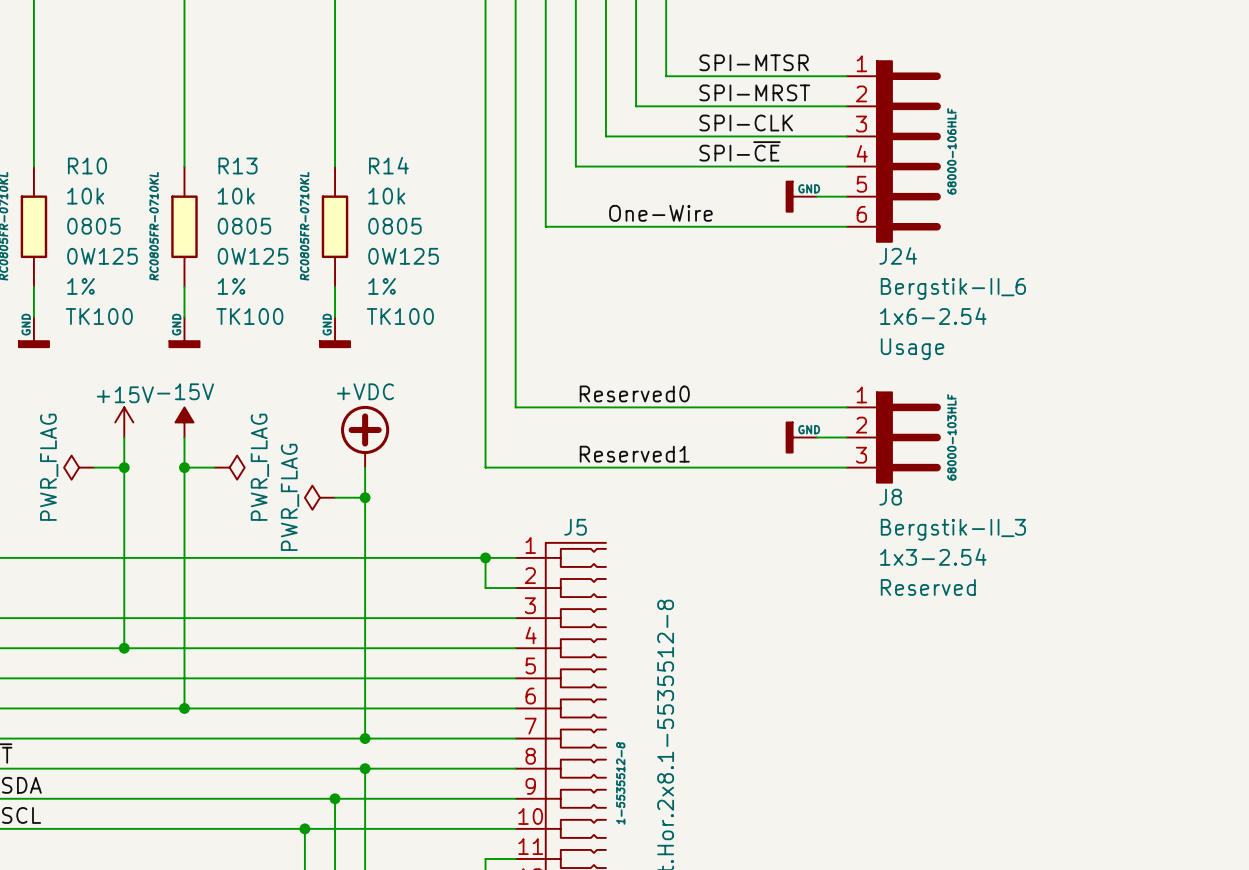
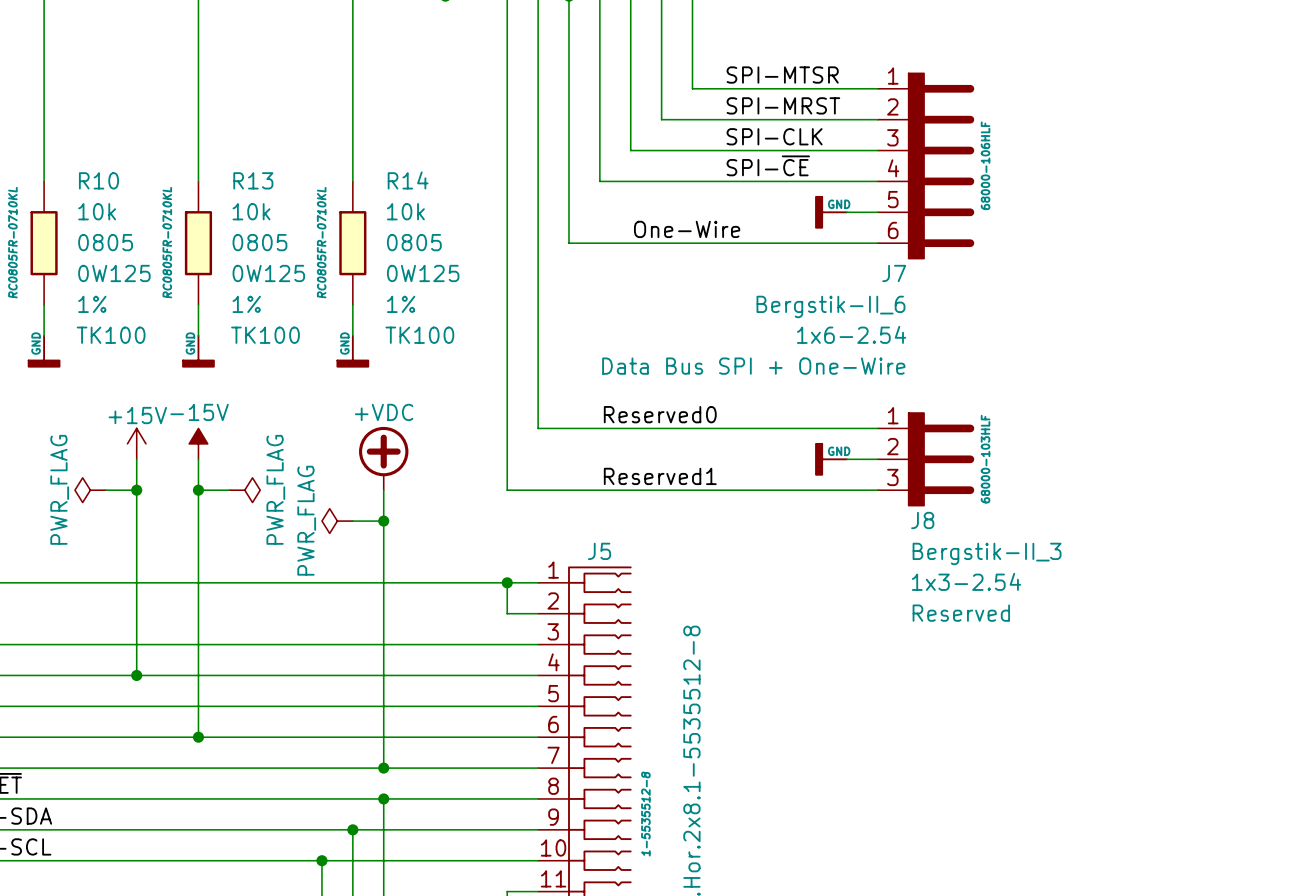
J24 name: J24 (898, 255) -> J7 (894, 273)
J24 value position: Bergstik-II_6 (953, 288) -> Bergstik-II_6 (830, 306)
J24 text position: 1x6-2.54 (933, 316) -> 1x6-2.54 (851, 334)
J24 text: Usage (912, 349) -> Data Bus SPI + One-Wire (753, 366)

